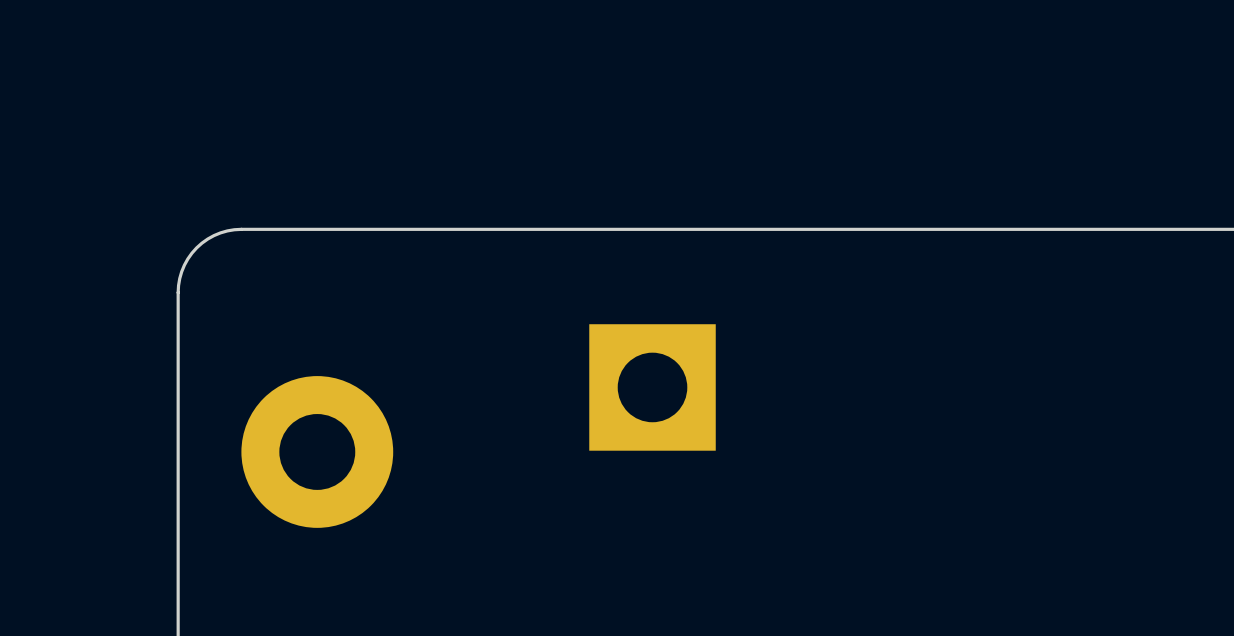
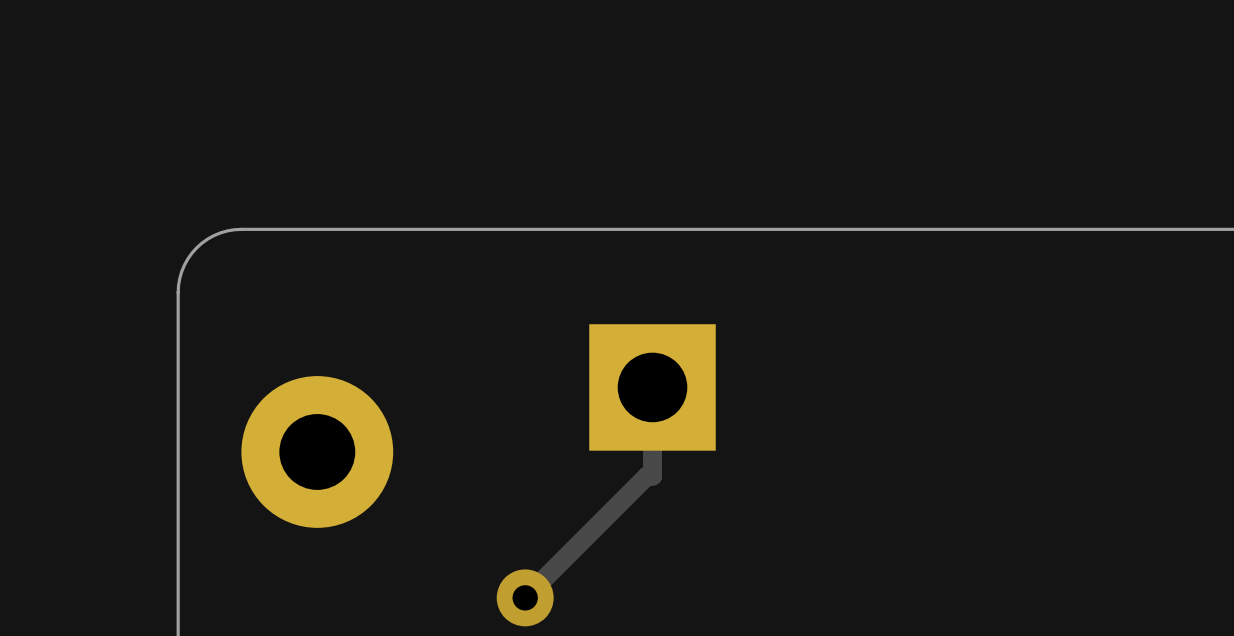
track: none -> (652, 387) (652, 476) (646, 476) (525, 597)
via: none -> (525, 597)

